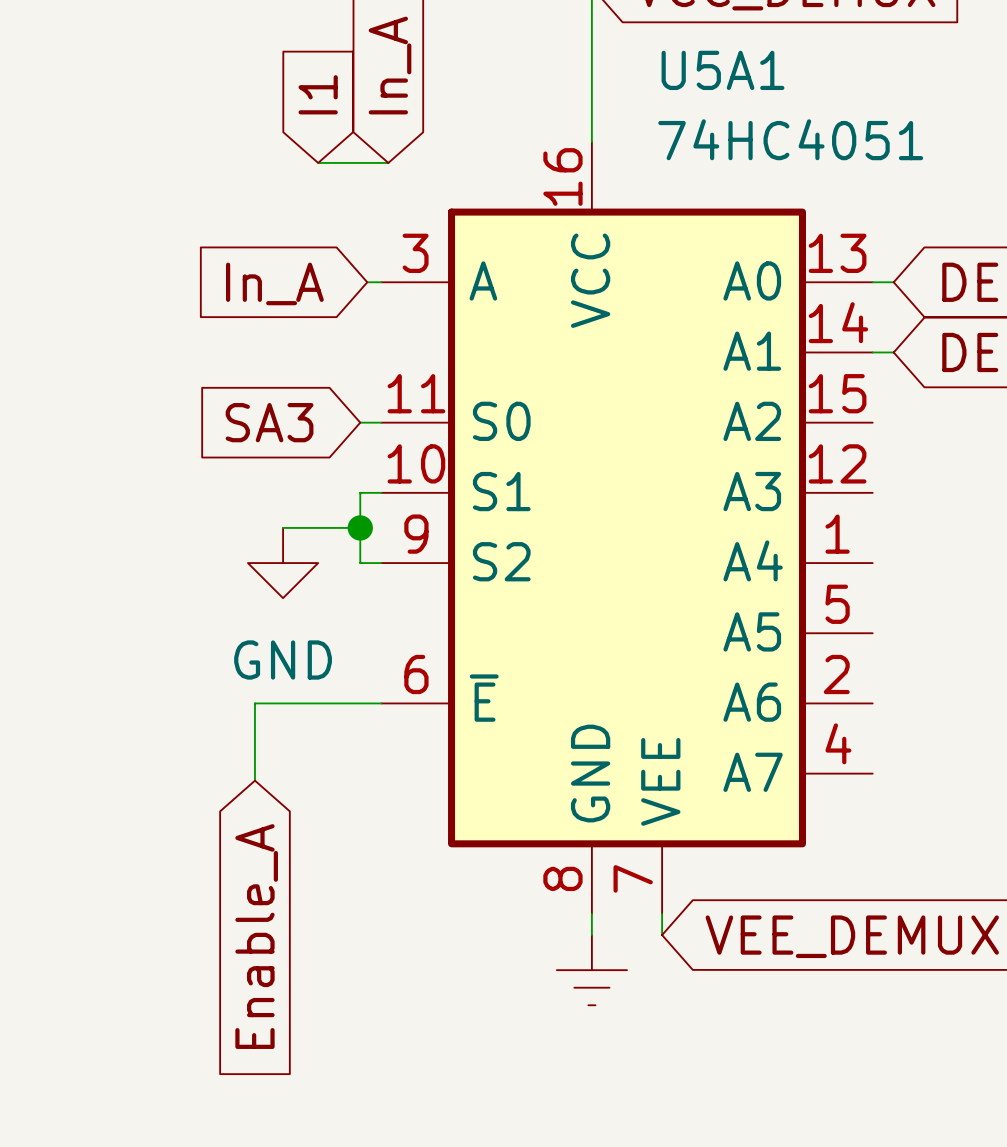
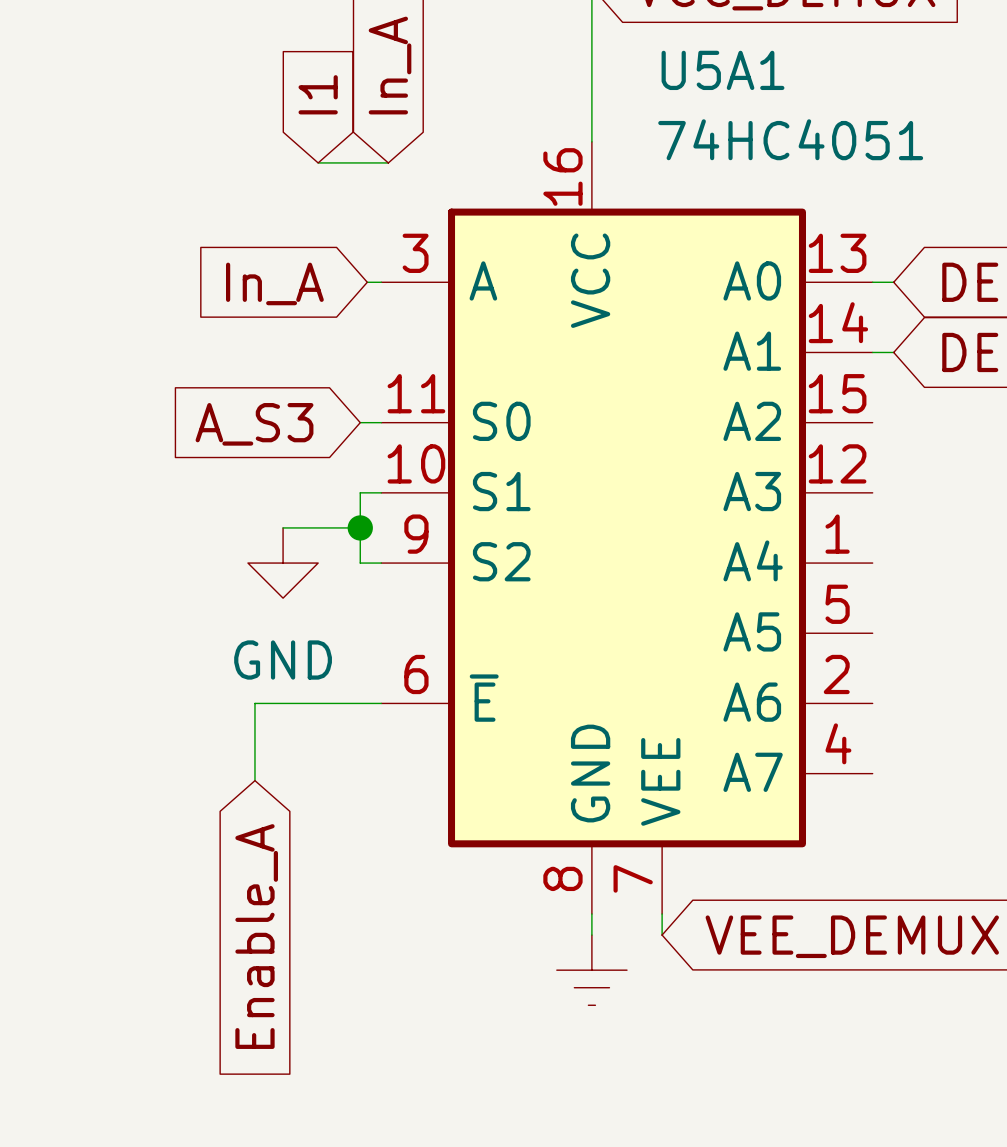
global label: SA3 (269, 422) -> A_S3 (254, 424)

